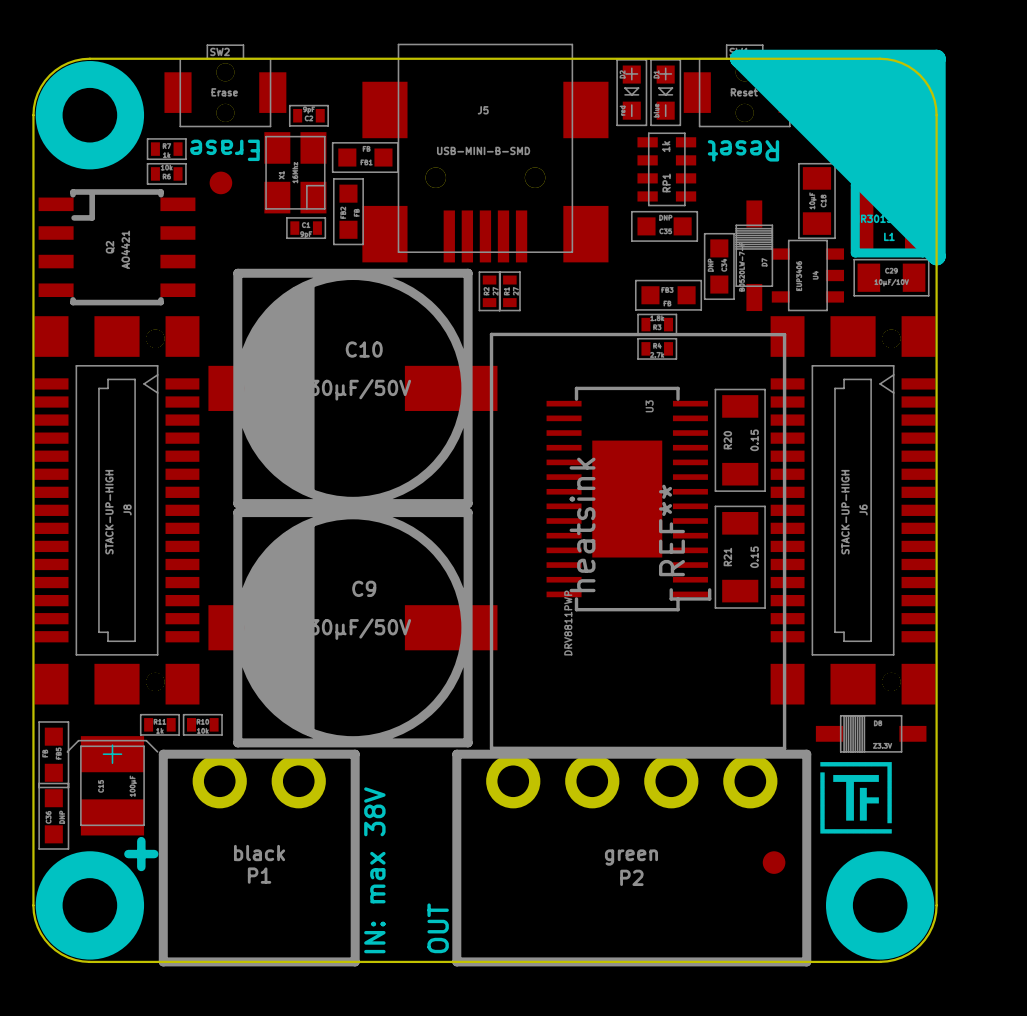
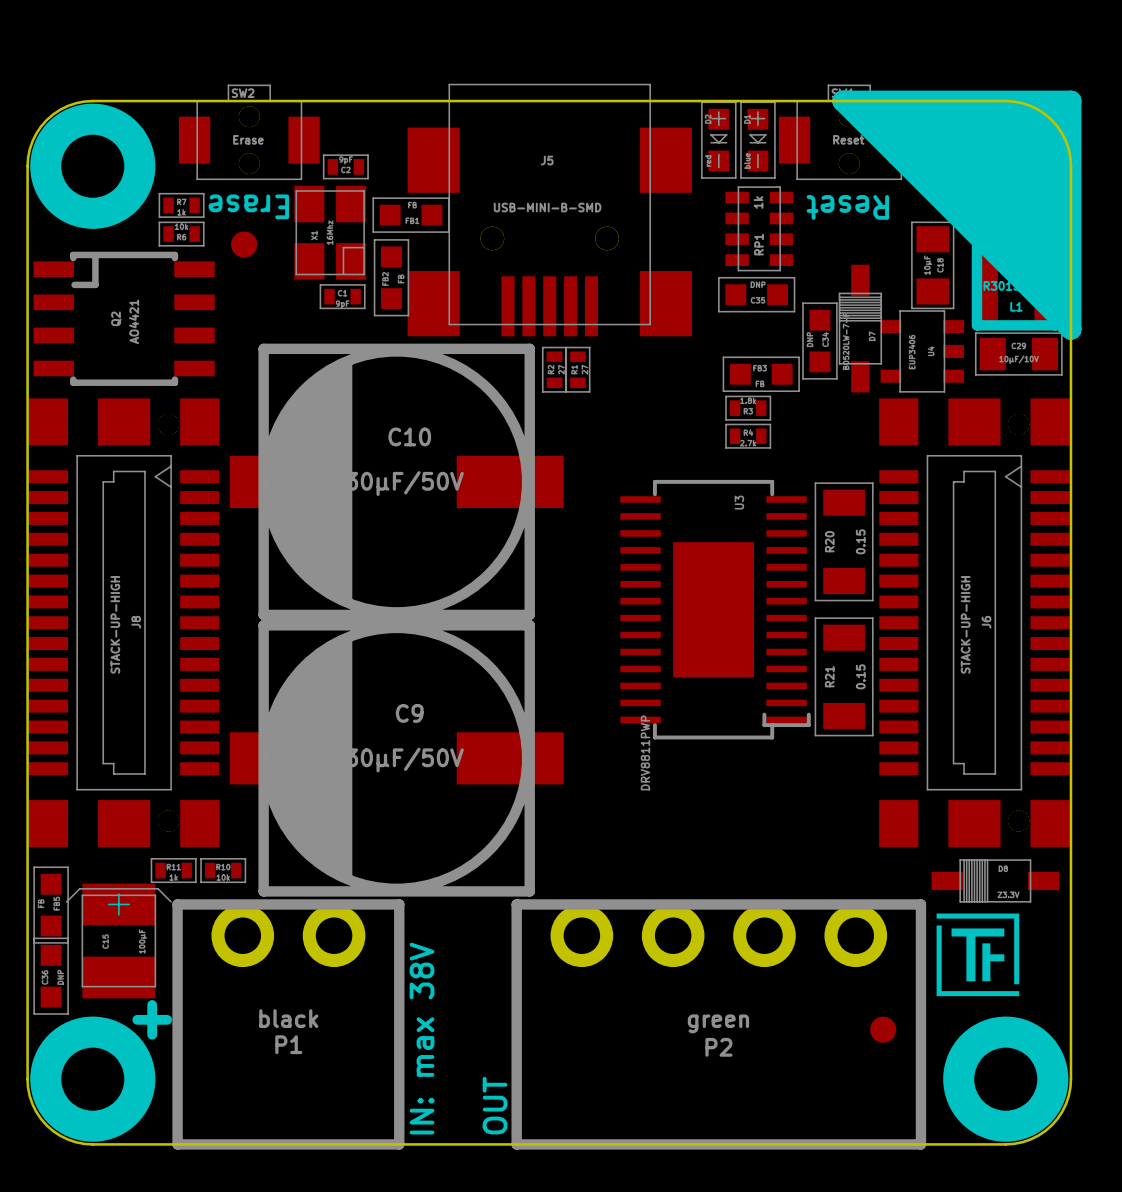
REF**: heatsink (638, 541) -> none

